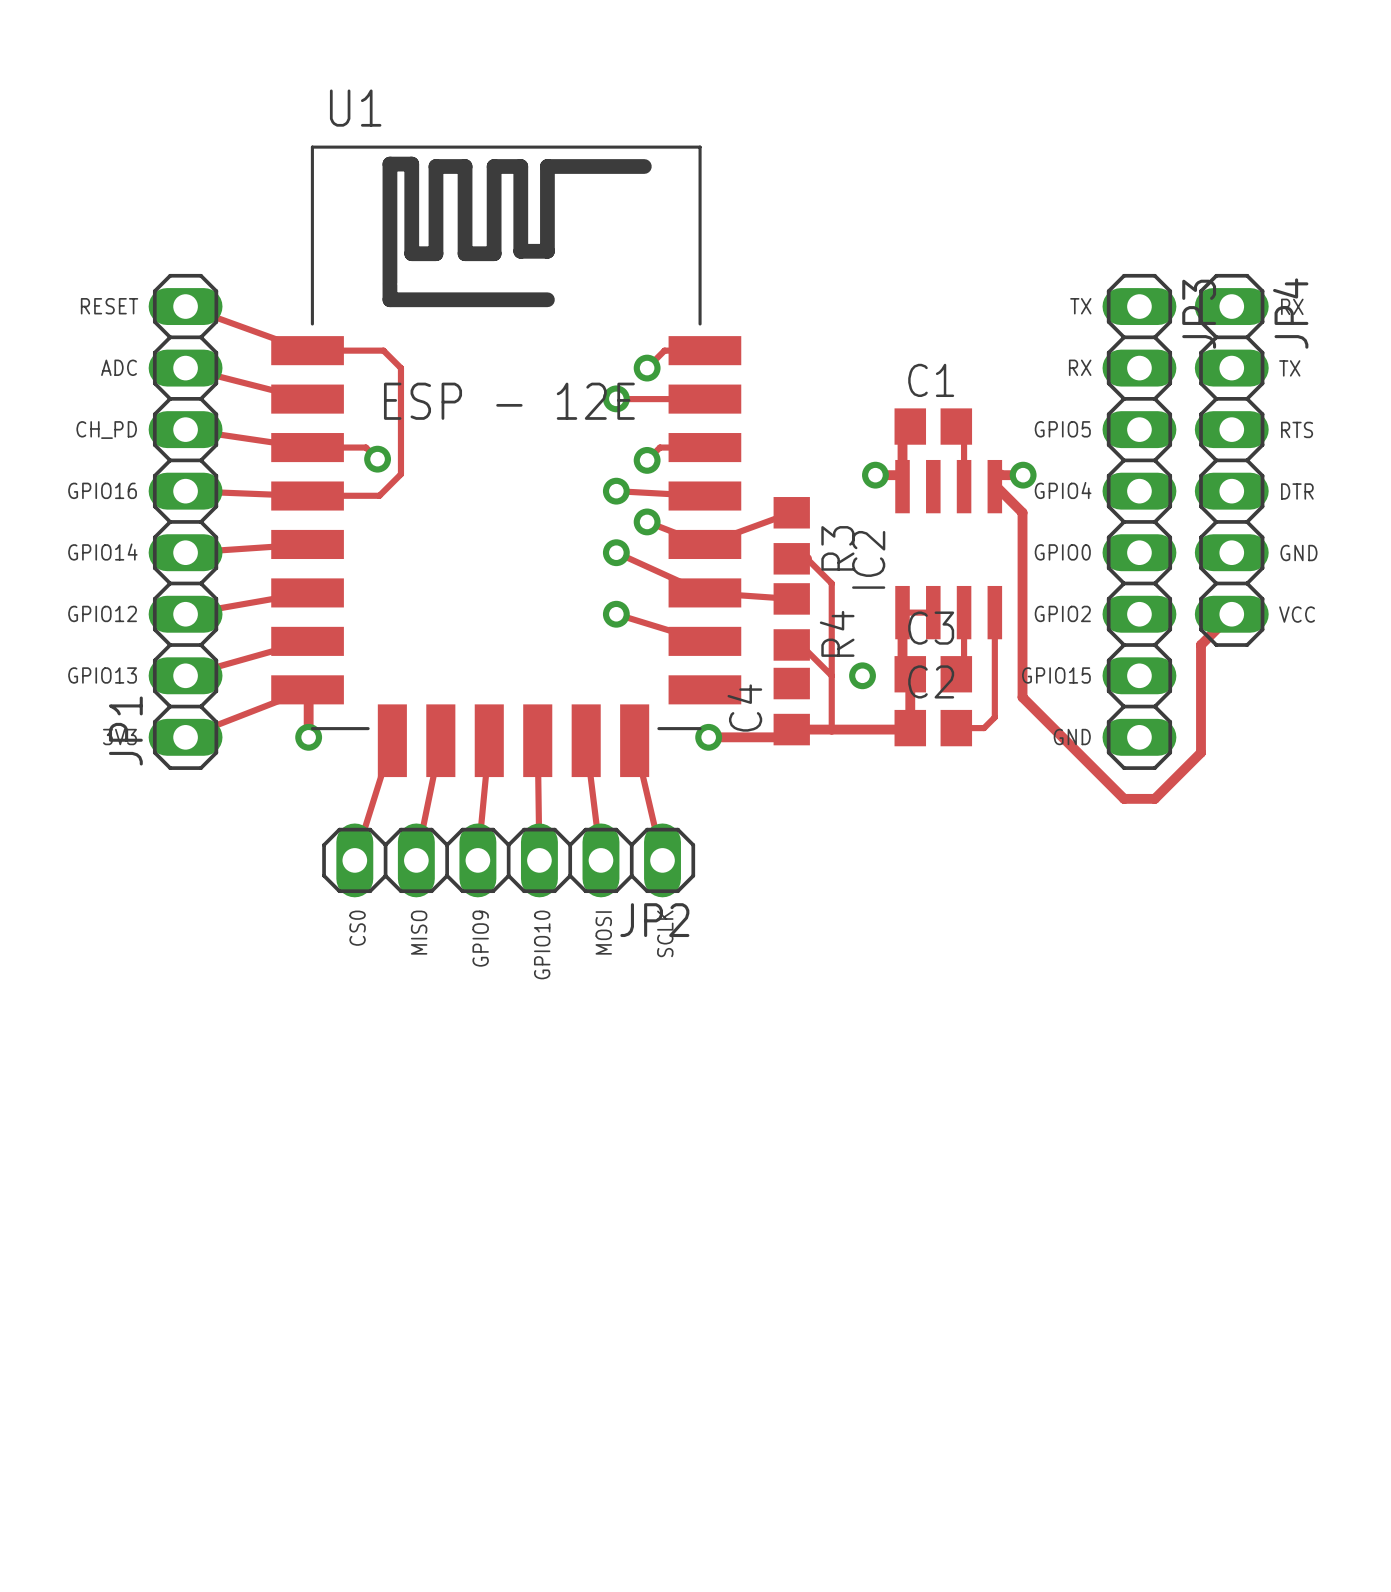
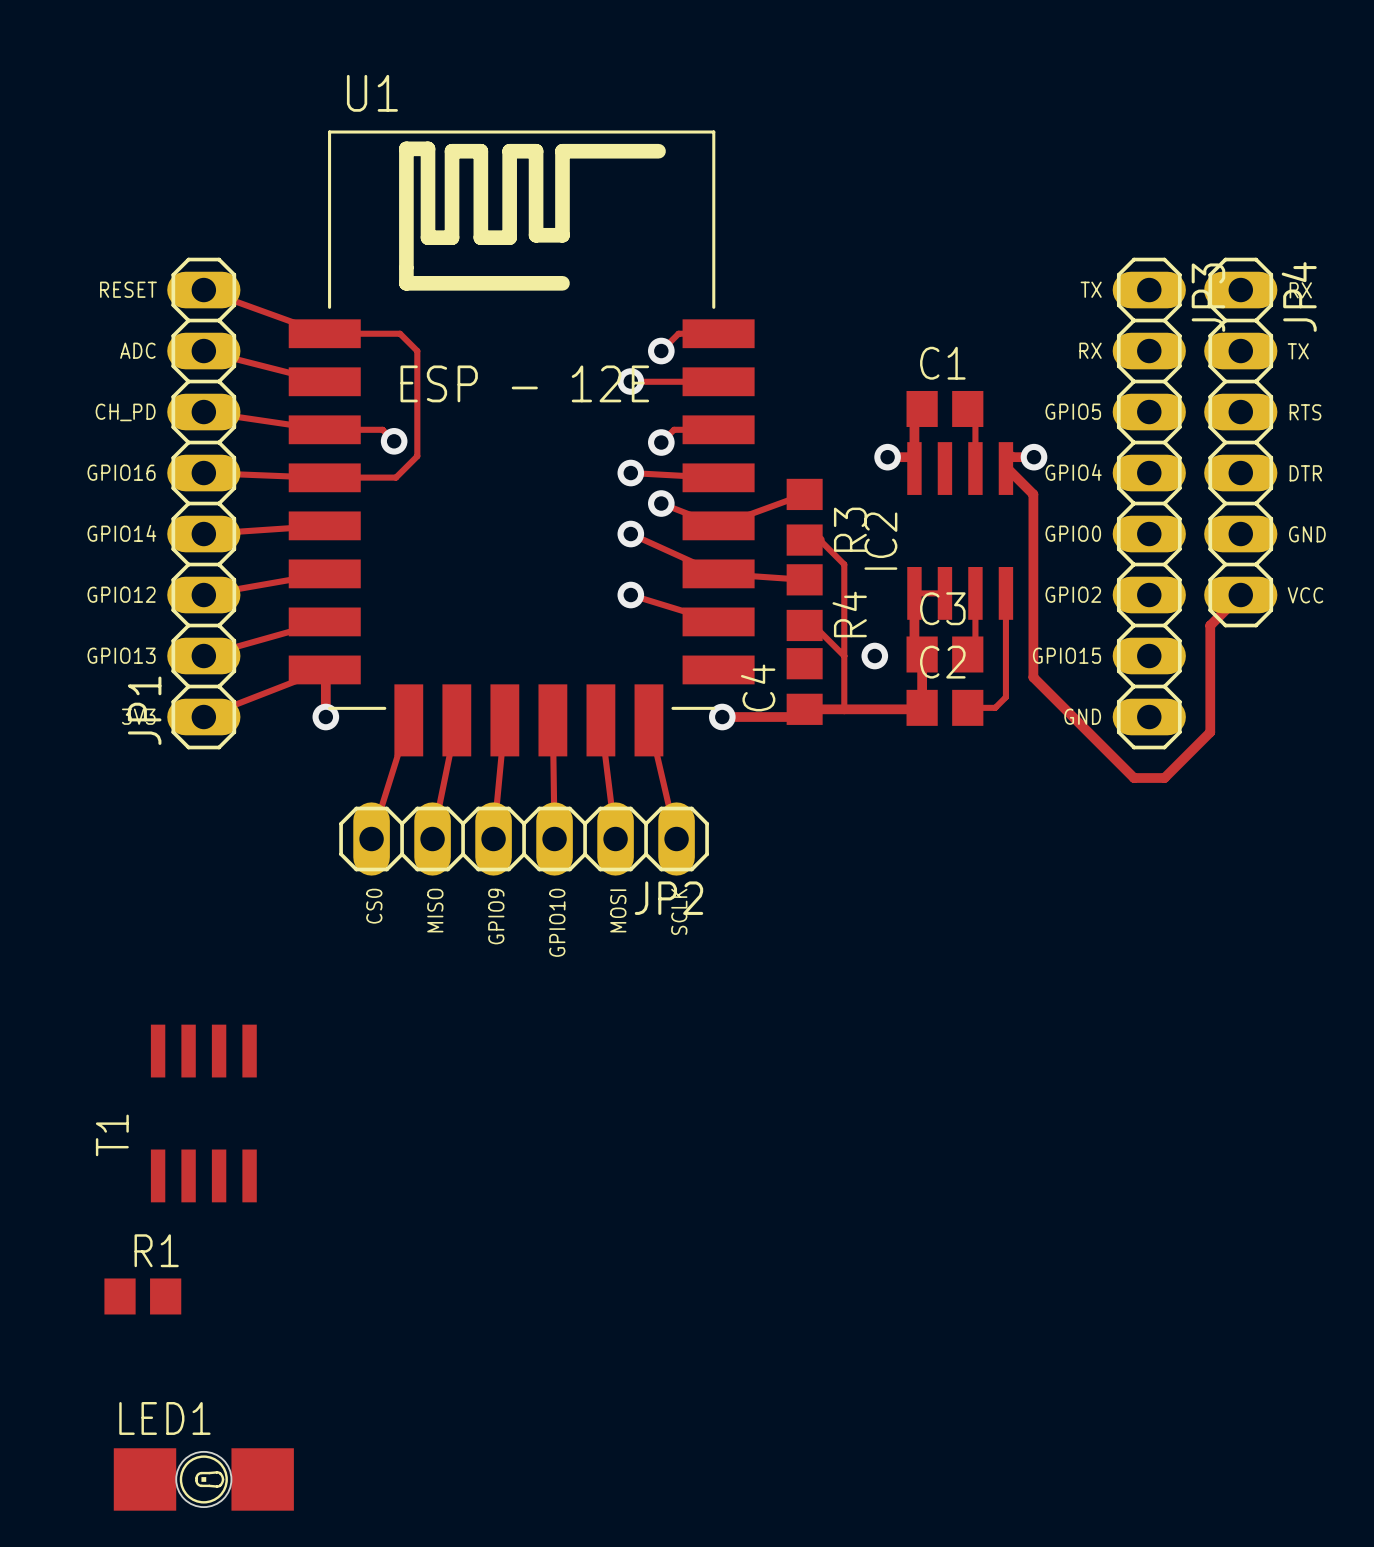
T1: none -> (203, 1113)
R1: none -> (142, 1296)
LED1: none -> (203, 1479)

